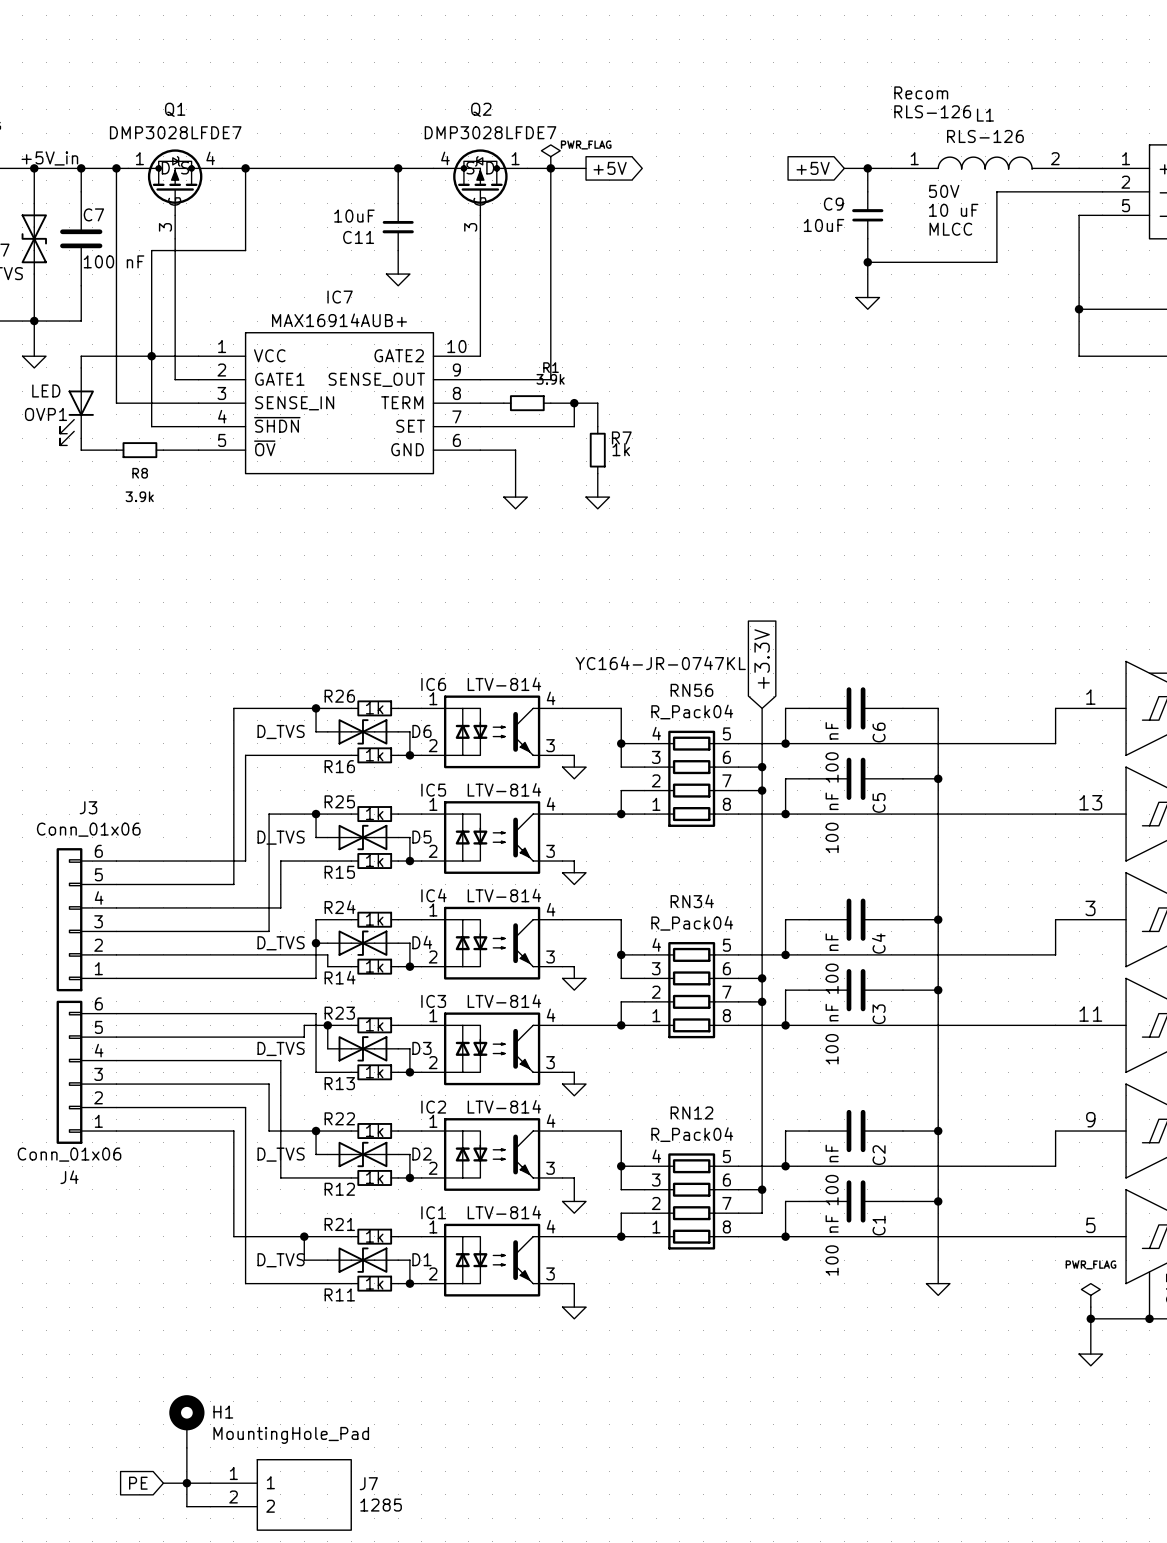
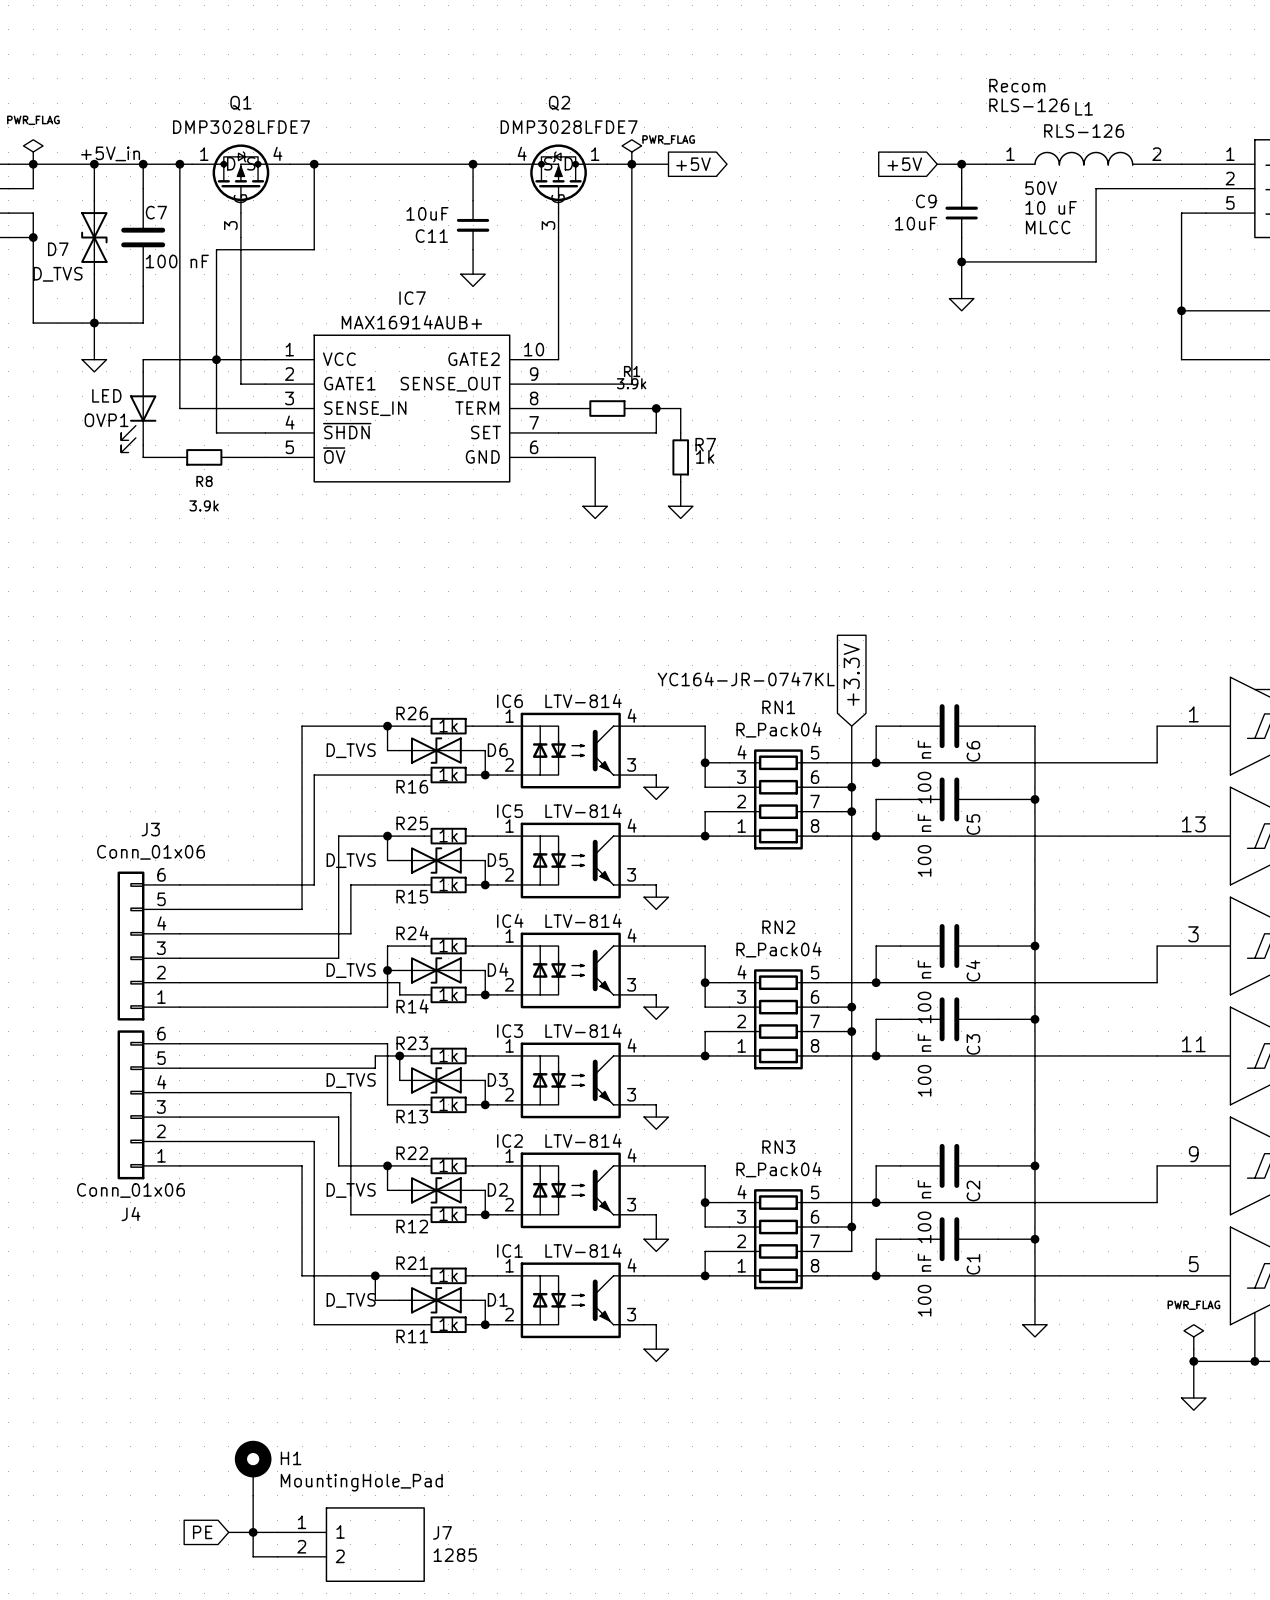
RN56 name: RN56 (691, 690) -> RN1 (778, 707)
RN34 name: RN34 (692, 901) -> RN2 (778, 927)
RN12 name: RN12 (691, 1112) -> RN3 (778, 1147)

